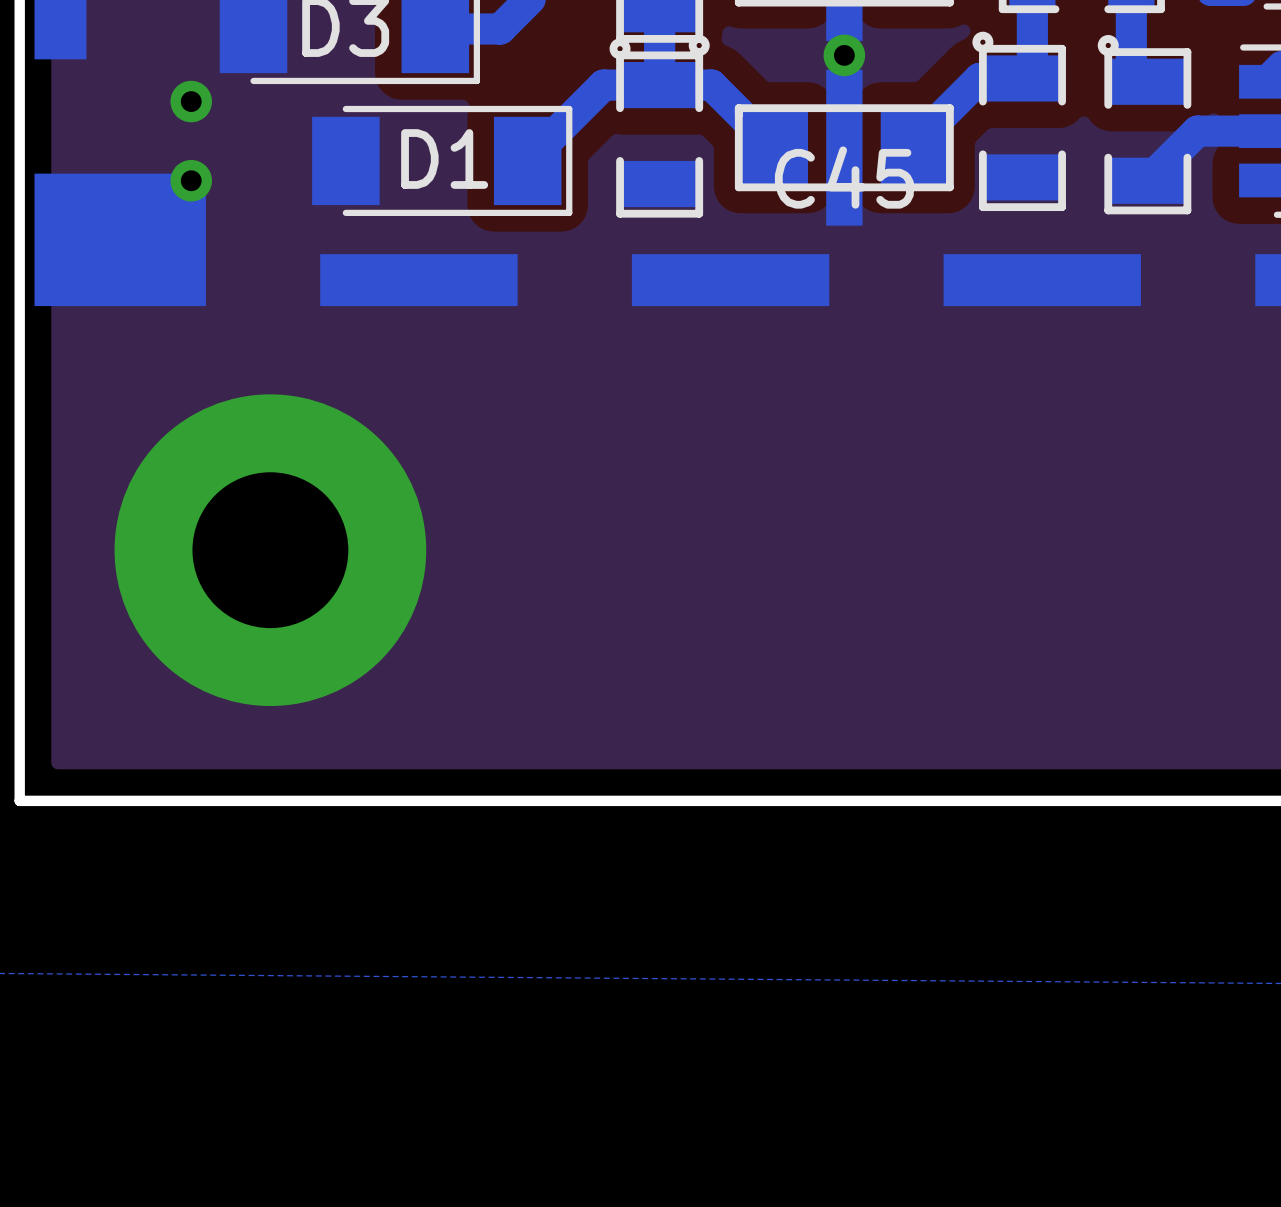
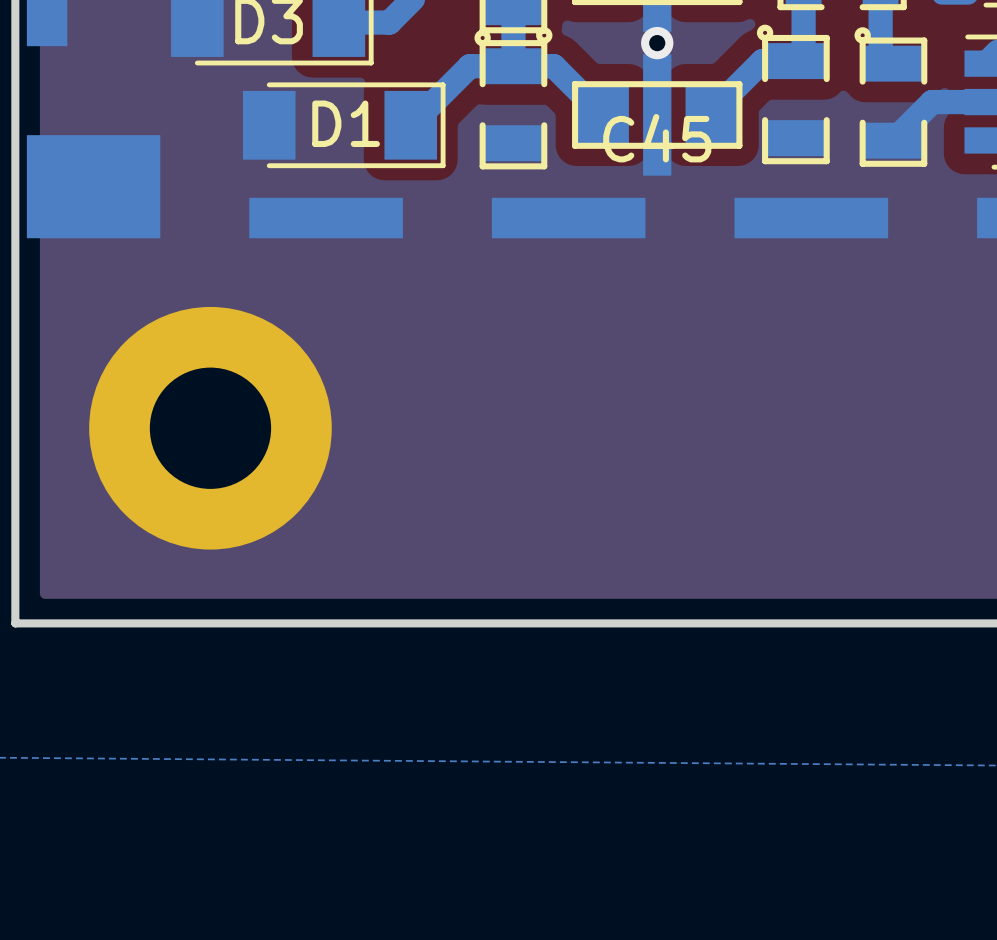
via: (191, 101) -> none
via: (191, 180) -> none

